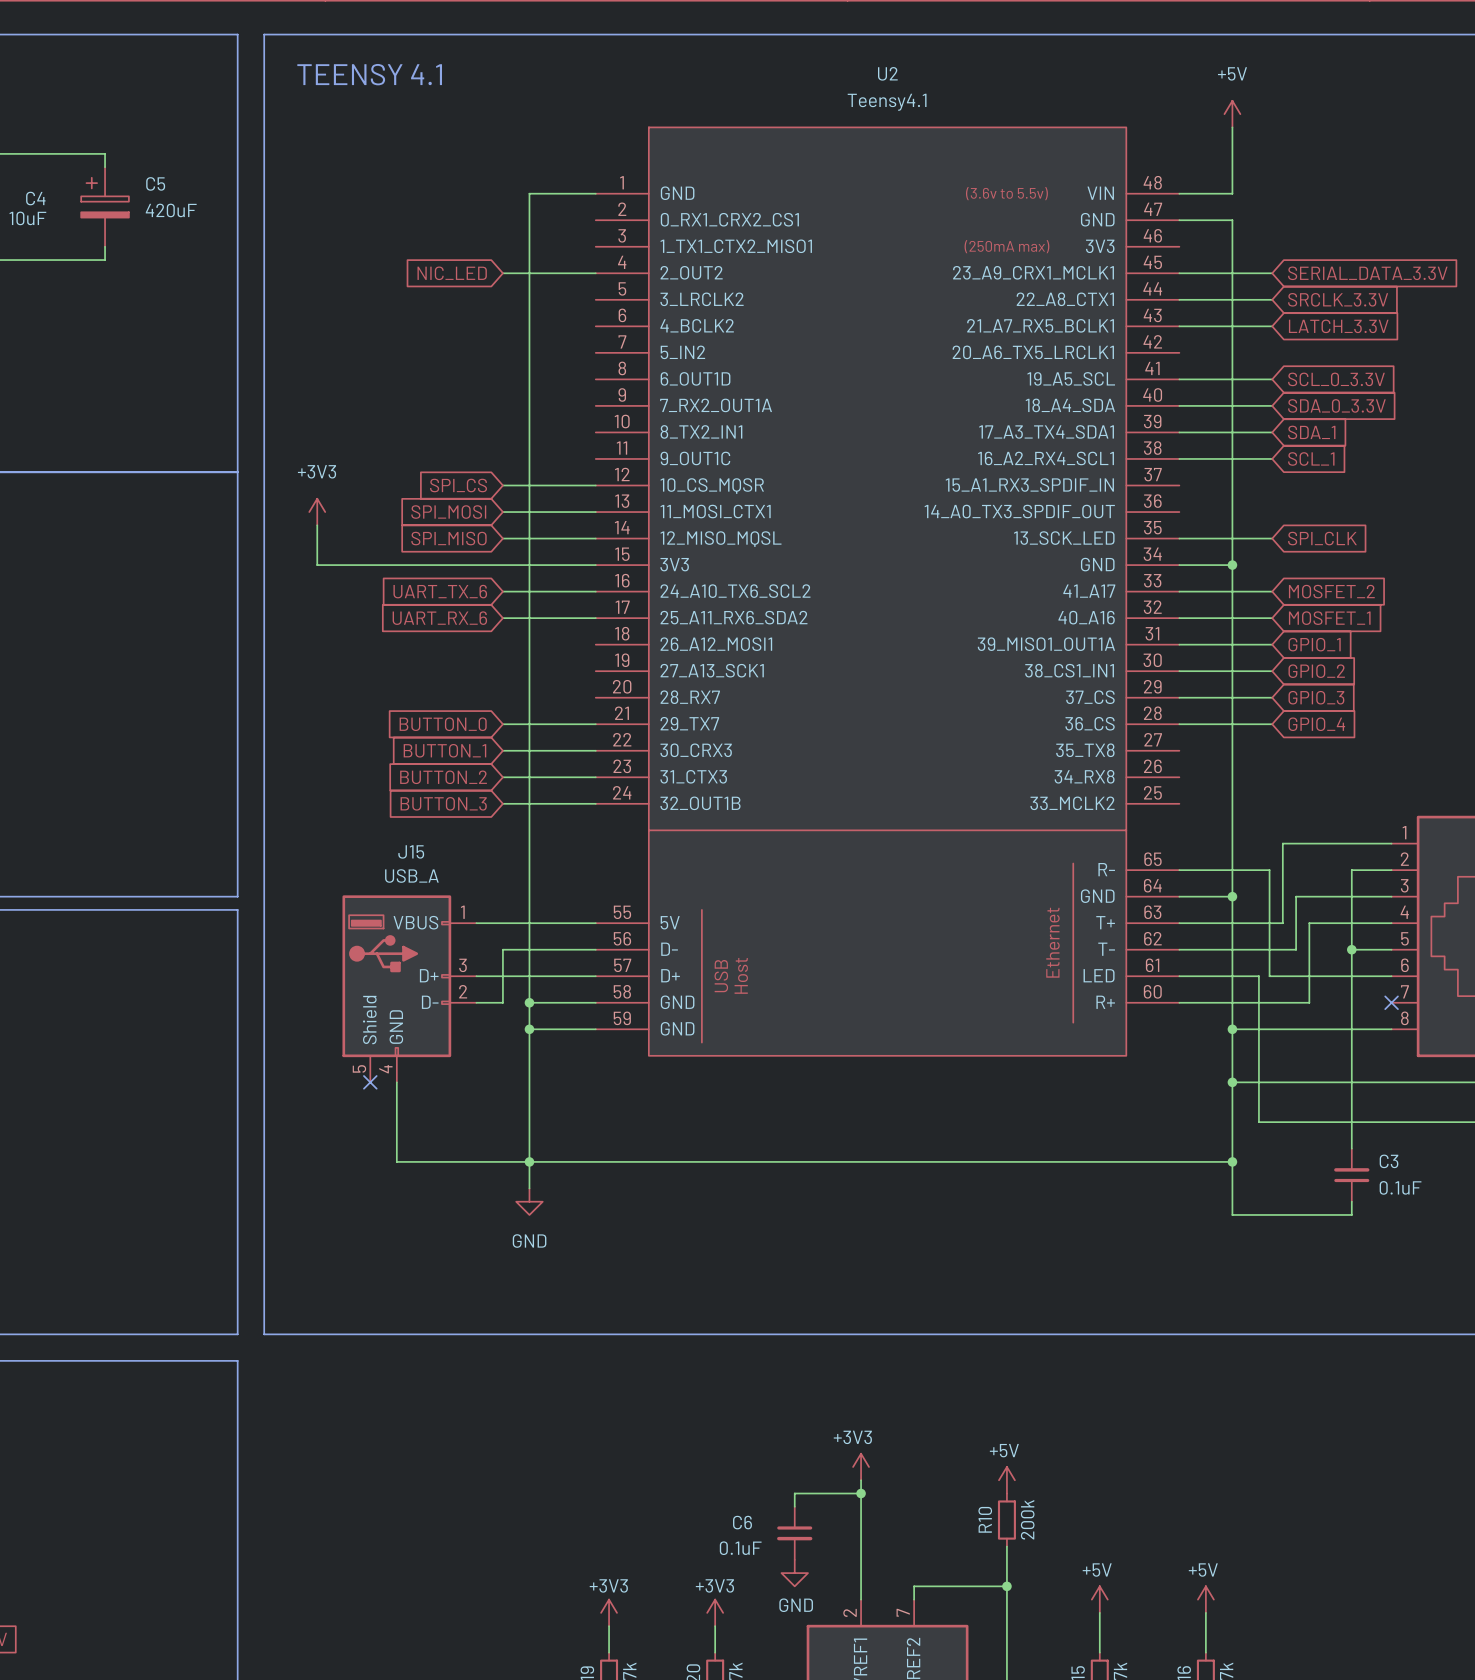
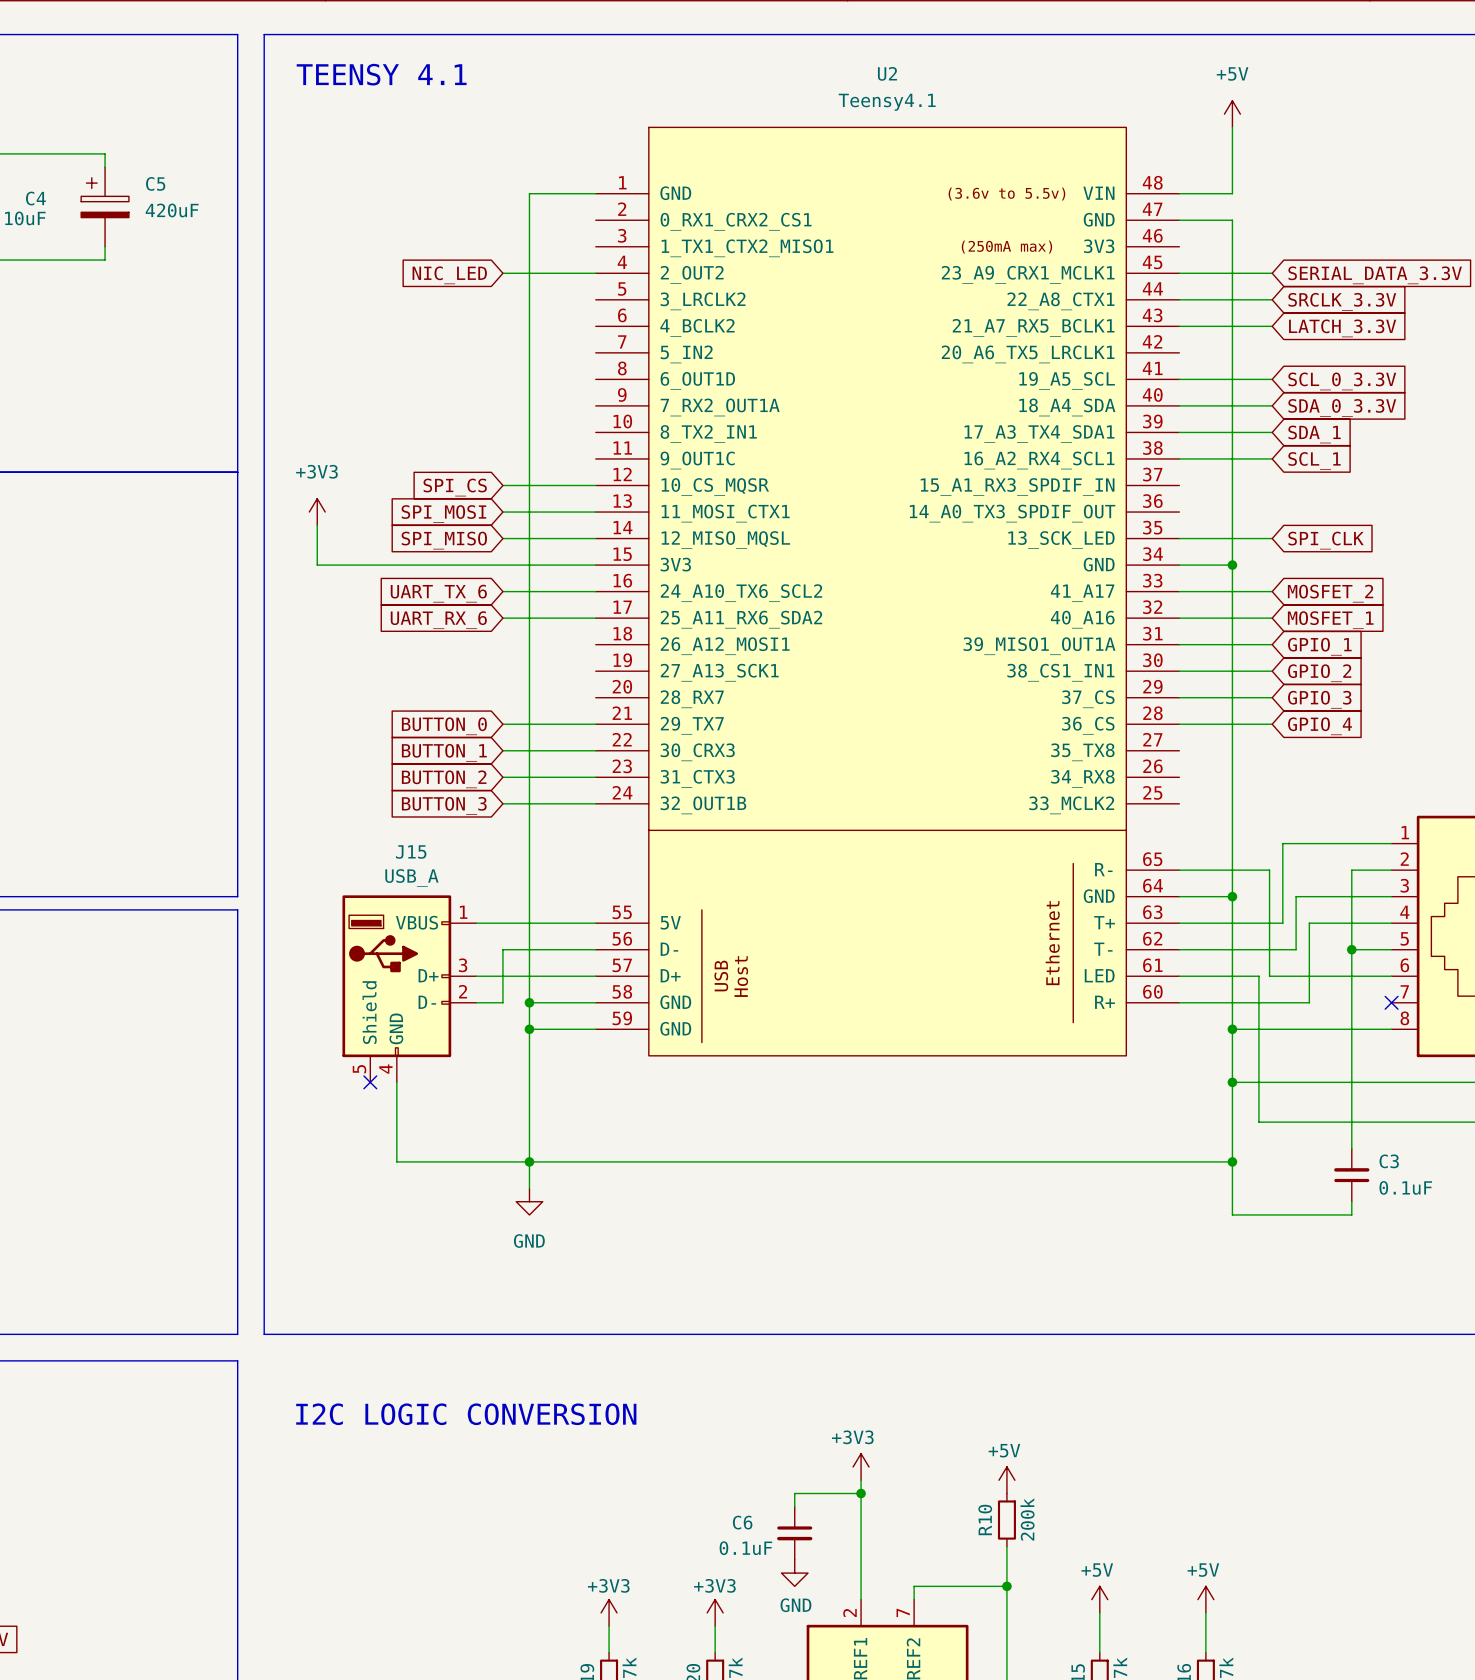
text: none -> I2C LOGIC CONVERSION (466, 1414)

